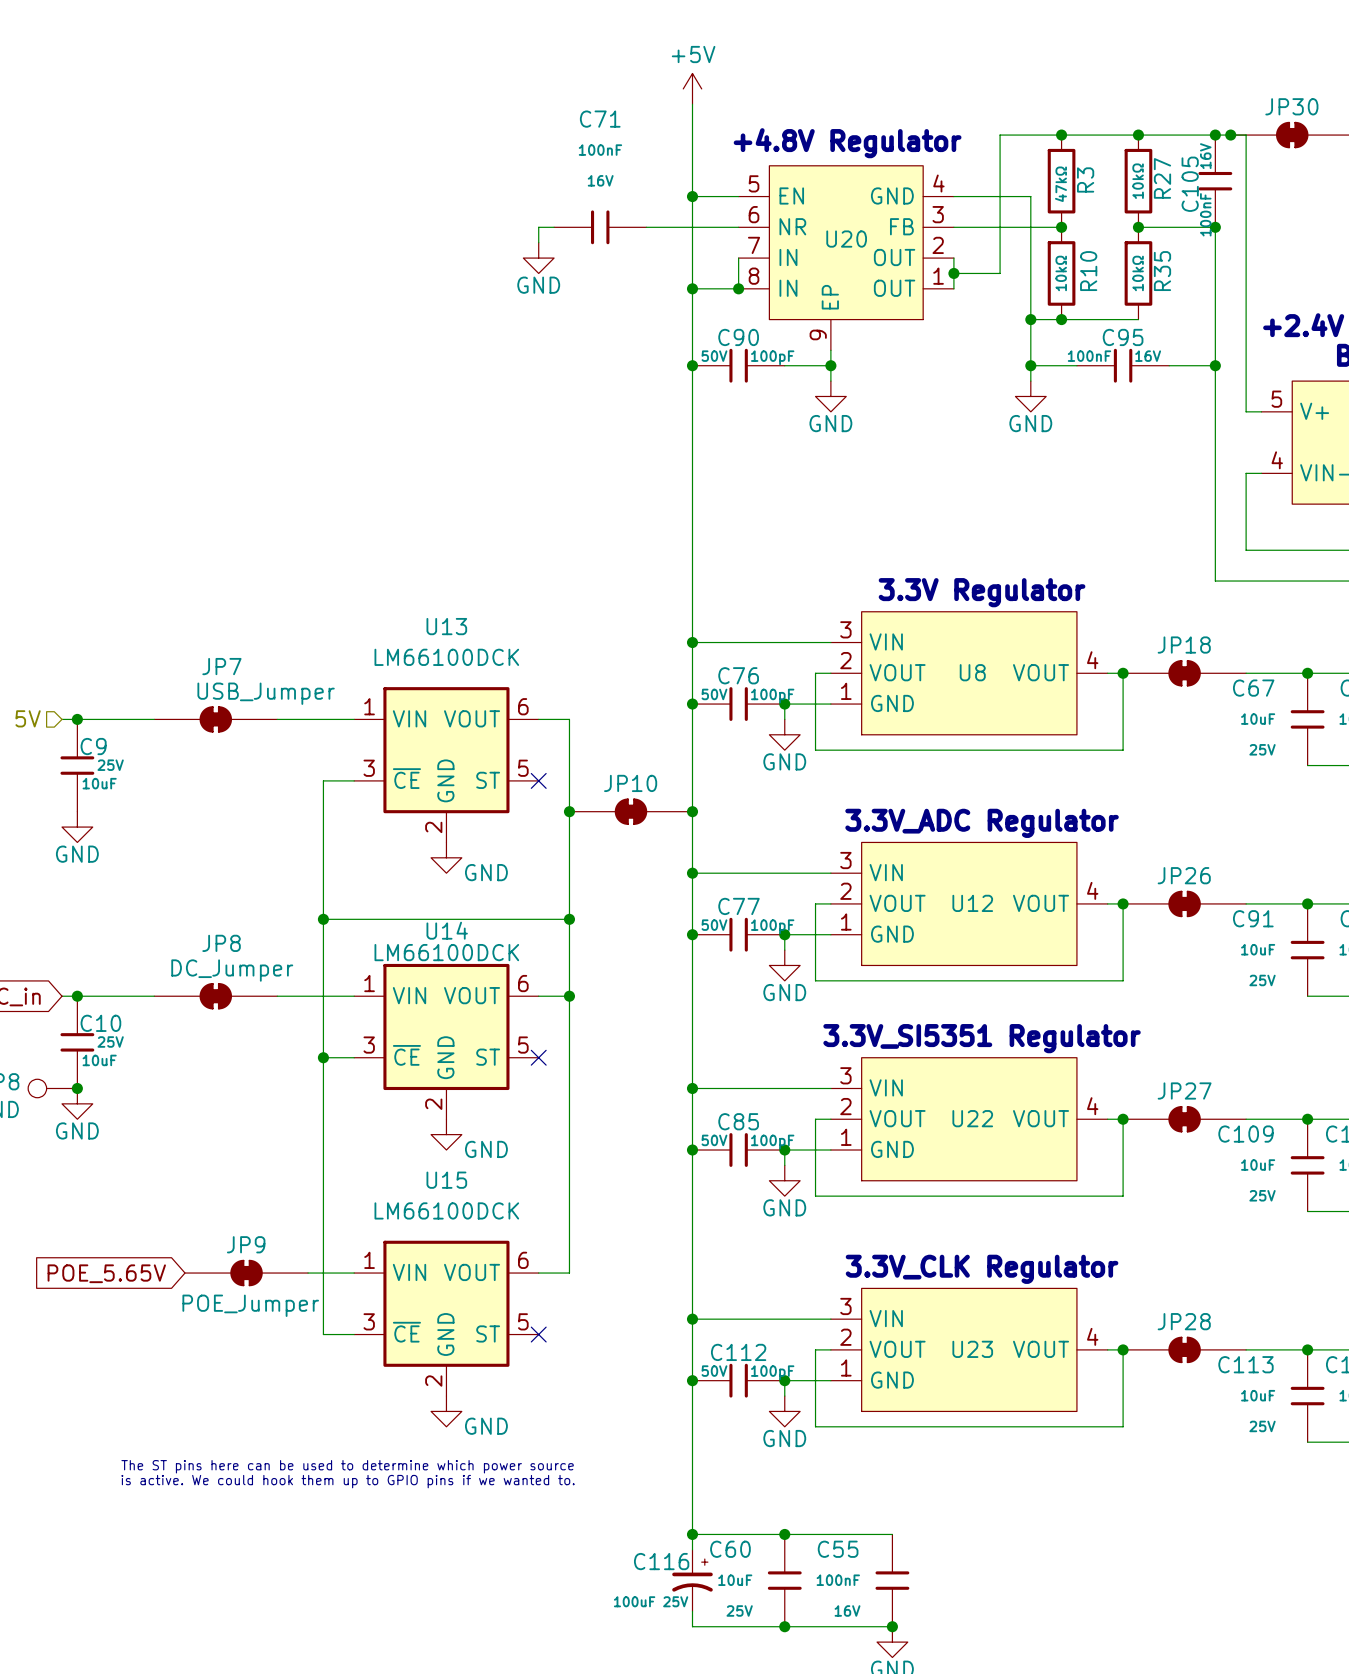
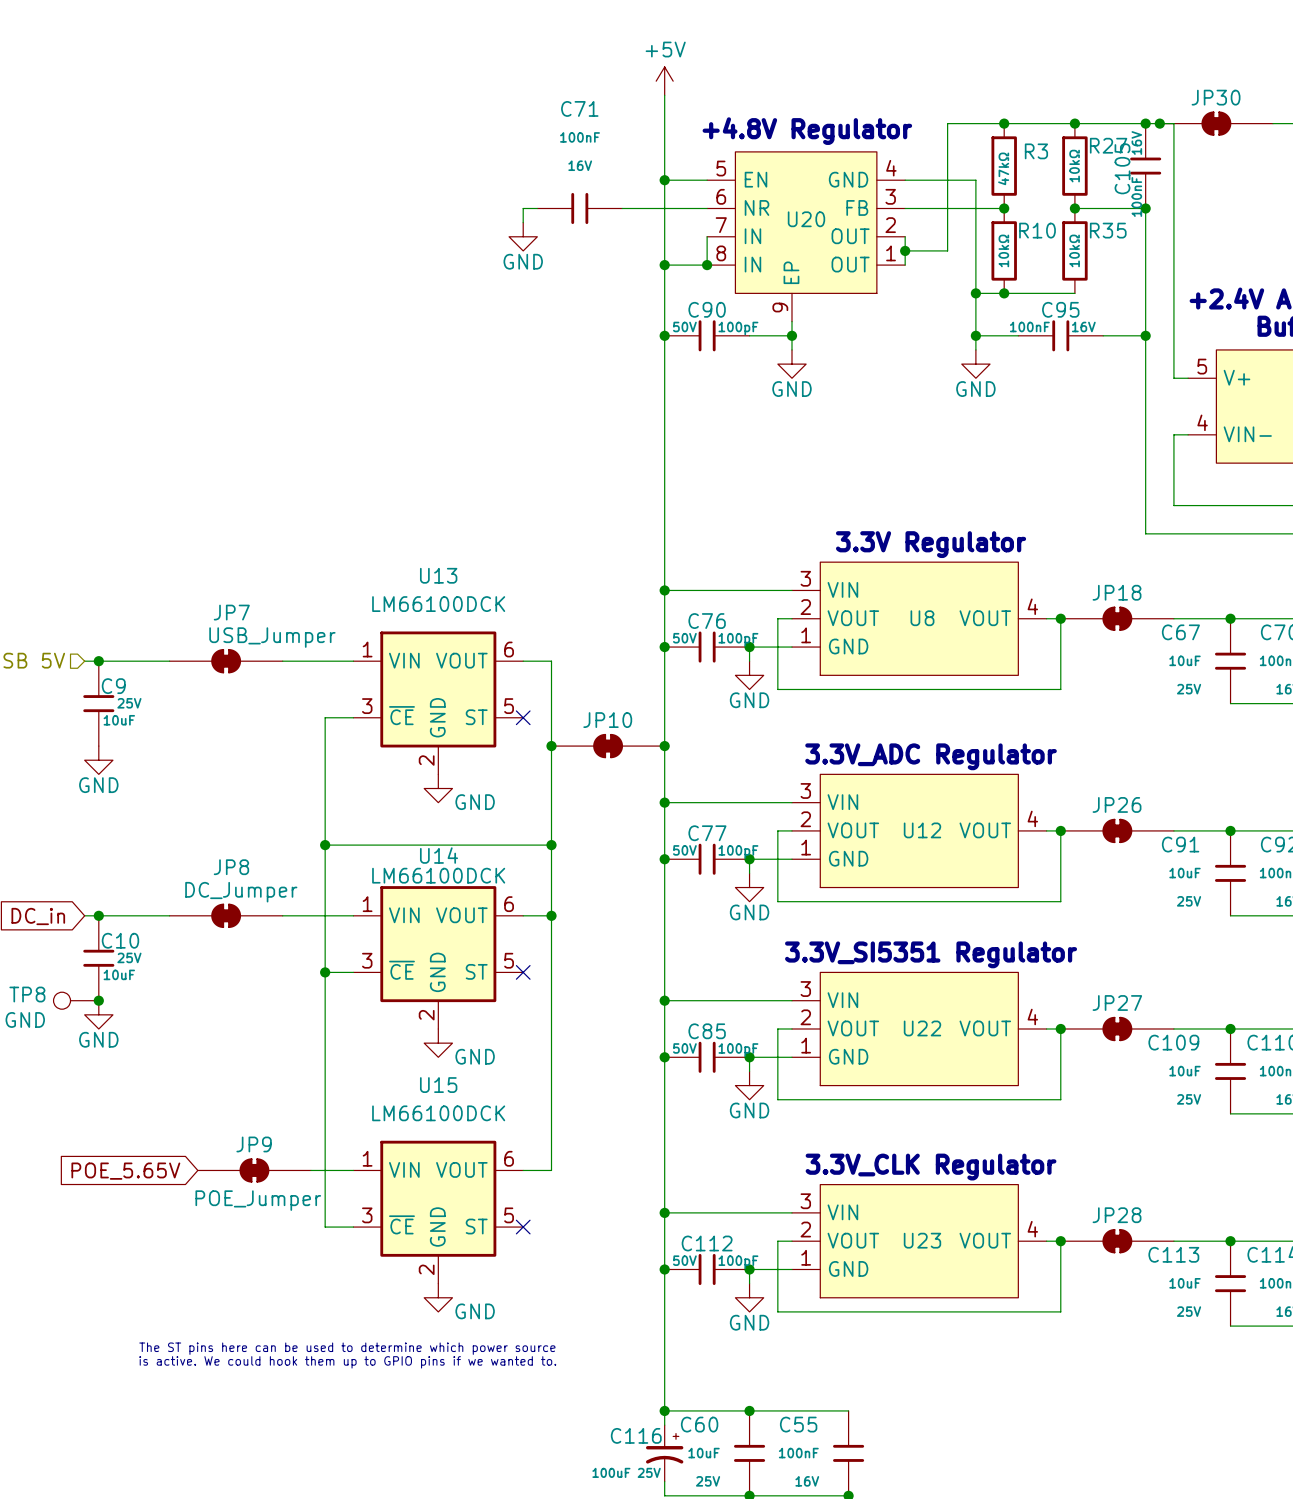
R27 name rotation: 0° (1162, 178) -> 90° clockwise (1108, 145)
R3 name rotation: 0° (1085, 179) -> 90° clockwise (1036, 151)
R10 name rotation: 0° (1088, 271) -> 90° clockwise (1037, 230)
R35 name rotation: 0° (1162, 271) -> 90° clockwise (1108, 230)

